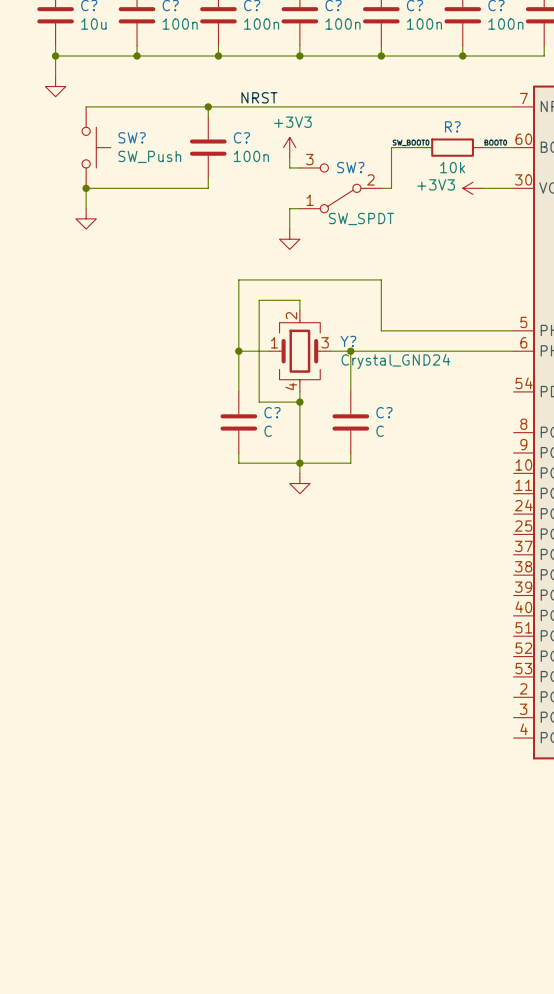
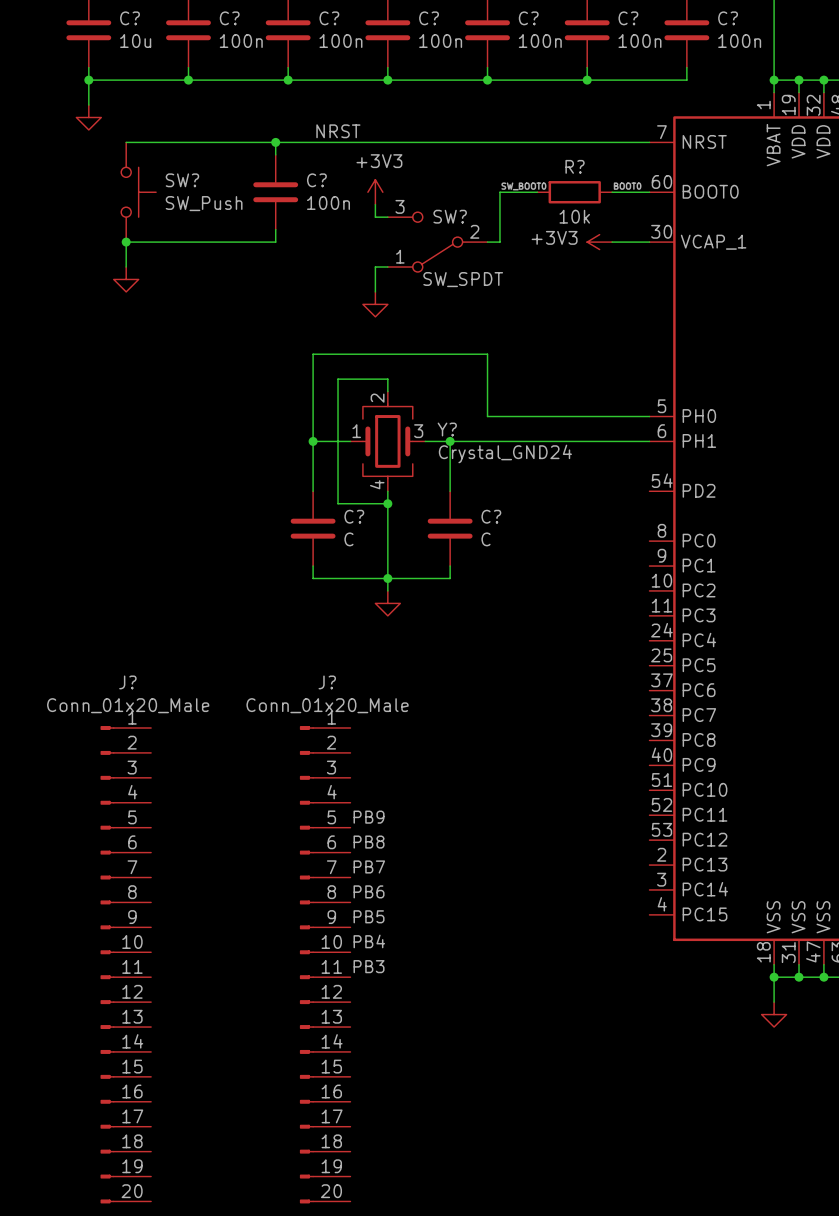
label: none -> PB9 (369, 817)
label: none -> PB8 (369, 842)
label: none -> PB7 (369, 866)
label: none -> PB6 (369, 891)
label: none -> PB5 (369, 916)
label: none -> PB4 (369, 941)
J?: none -> Conn_01x20_Male (125, 964)
J?: none -> Conn_01x20_Male (325, 964)
label: none -> PB3 (369, 966)

